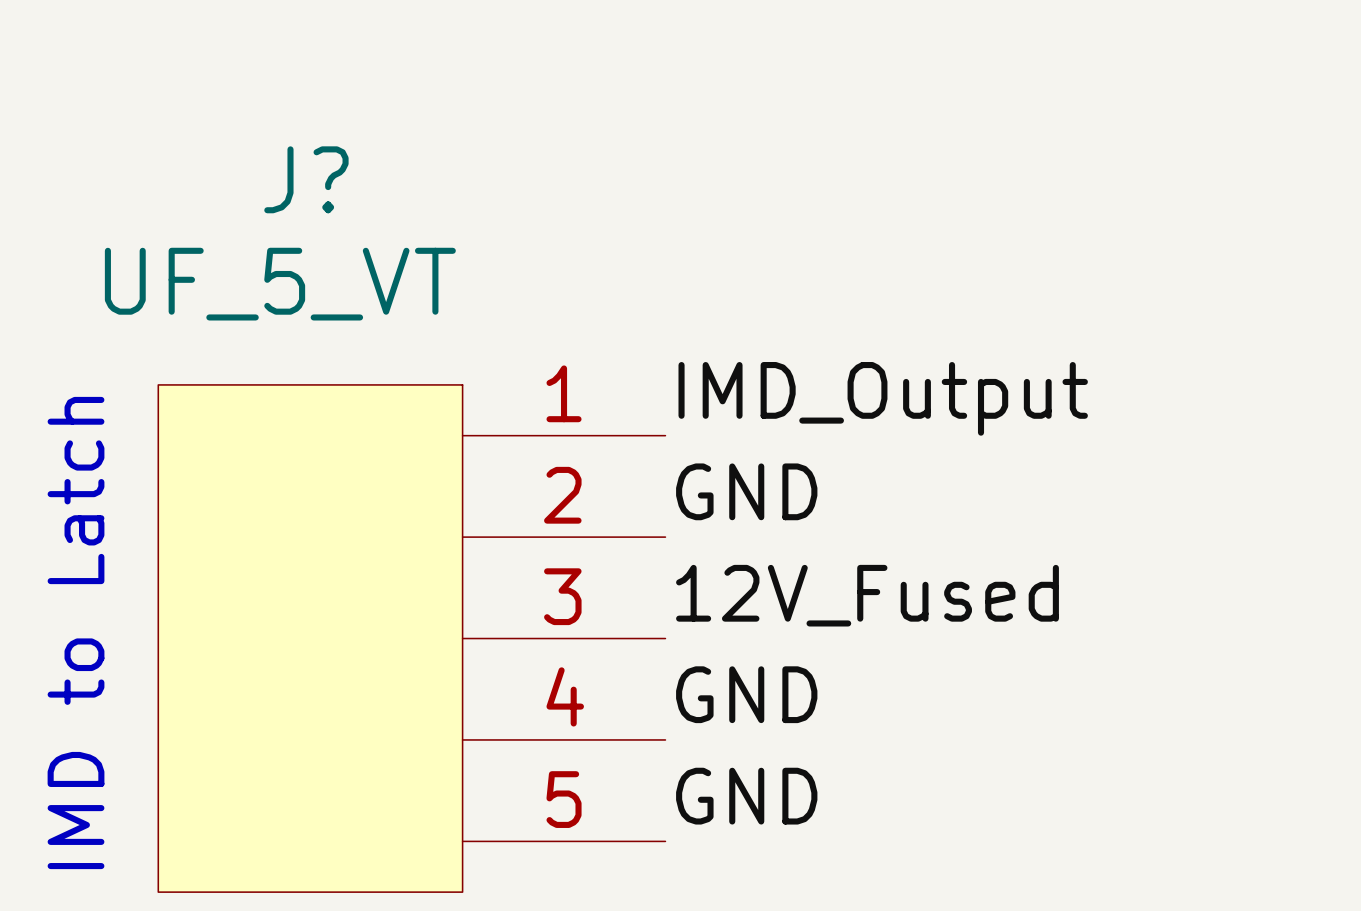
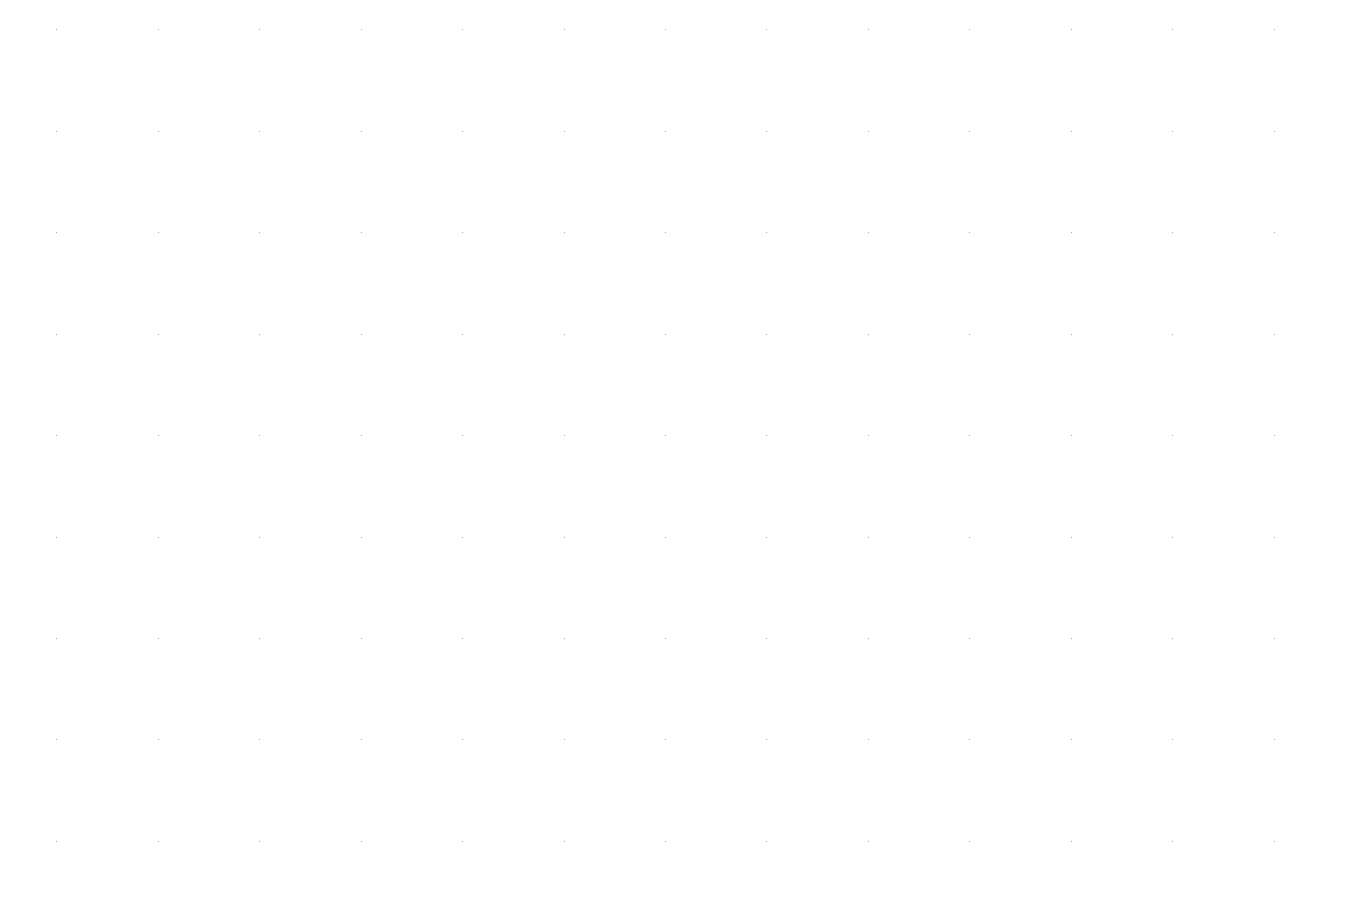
label: IMD_Output (883, 398) -> none
label: GND (746, 491) -> none
label: 12V_Fused (867, 595) -> none
text: IMD to Latch (76, 633) -> none
J?: UF_5_VT (411, 638) -> none
label: GND (746, 694) -> none
label: GND (746, 796) -> none

